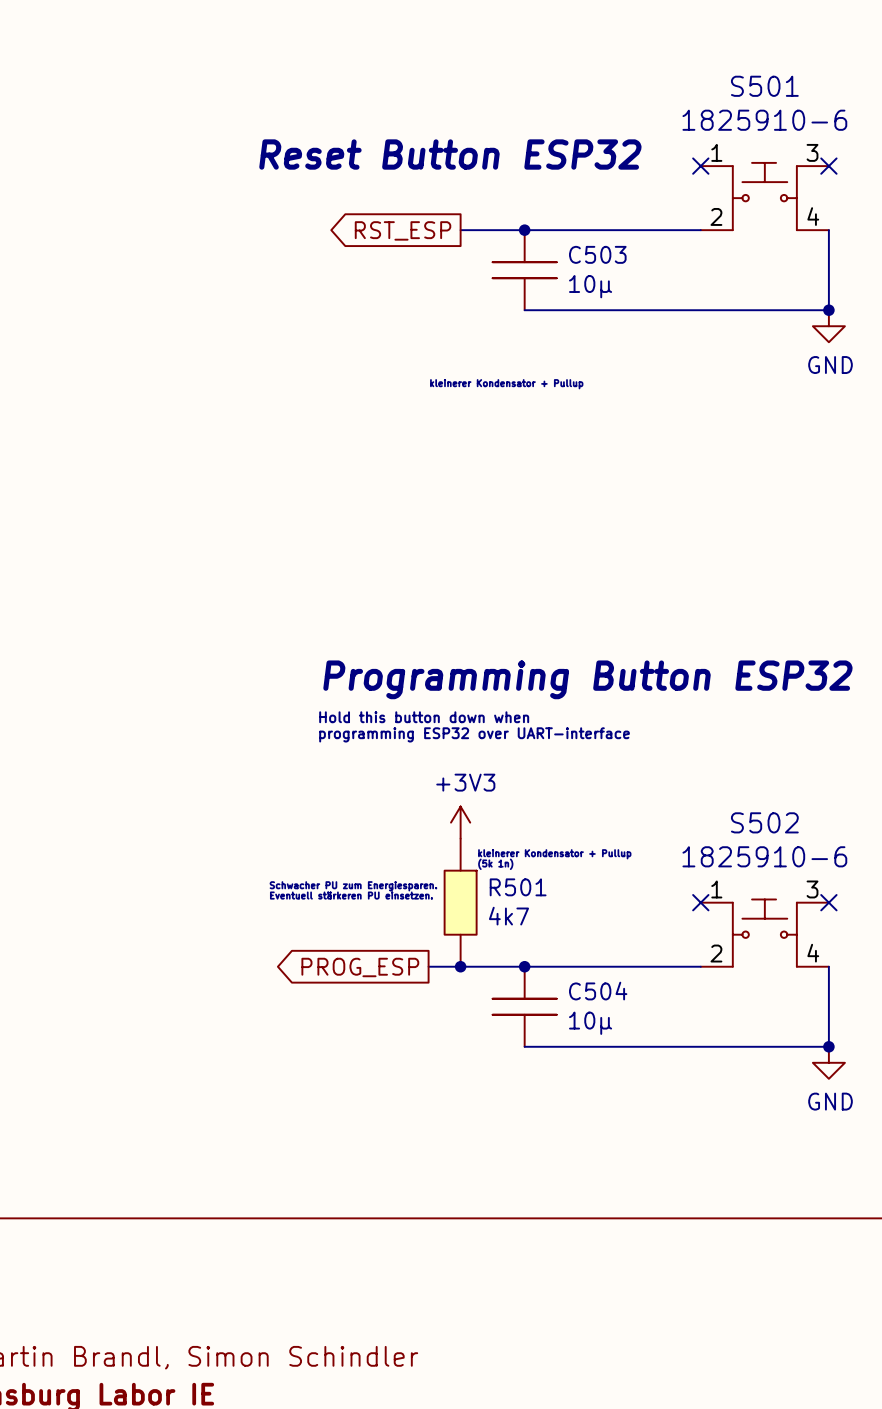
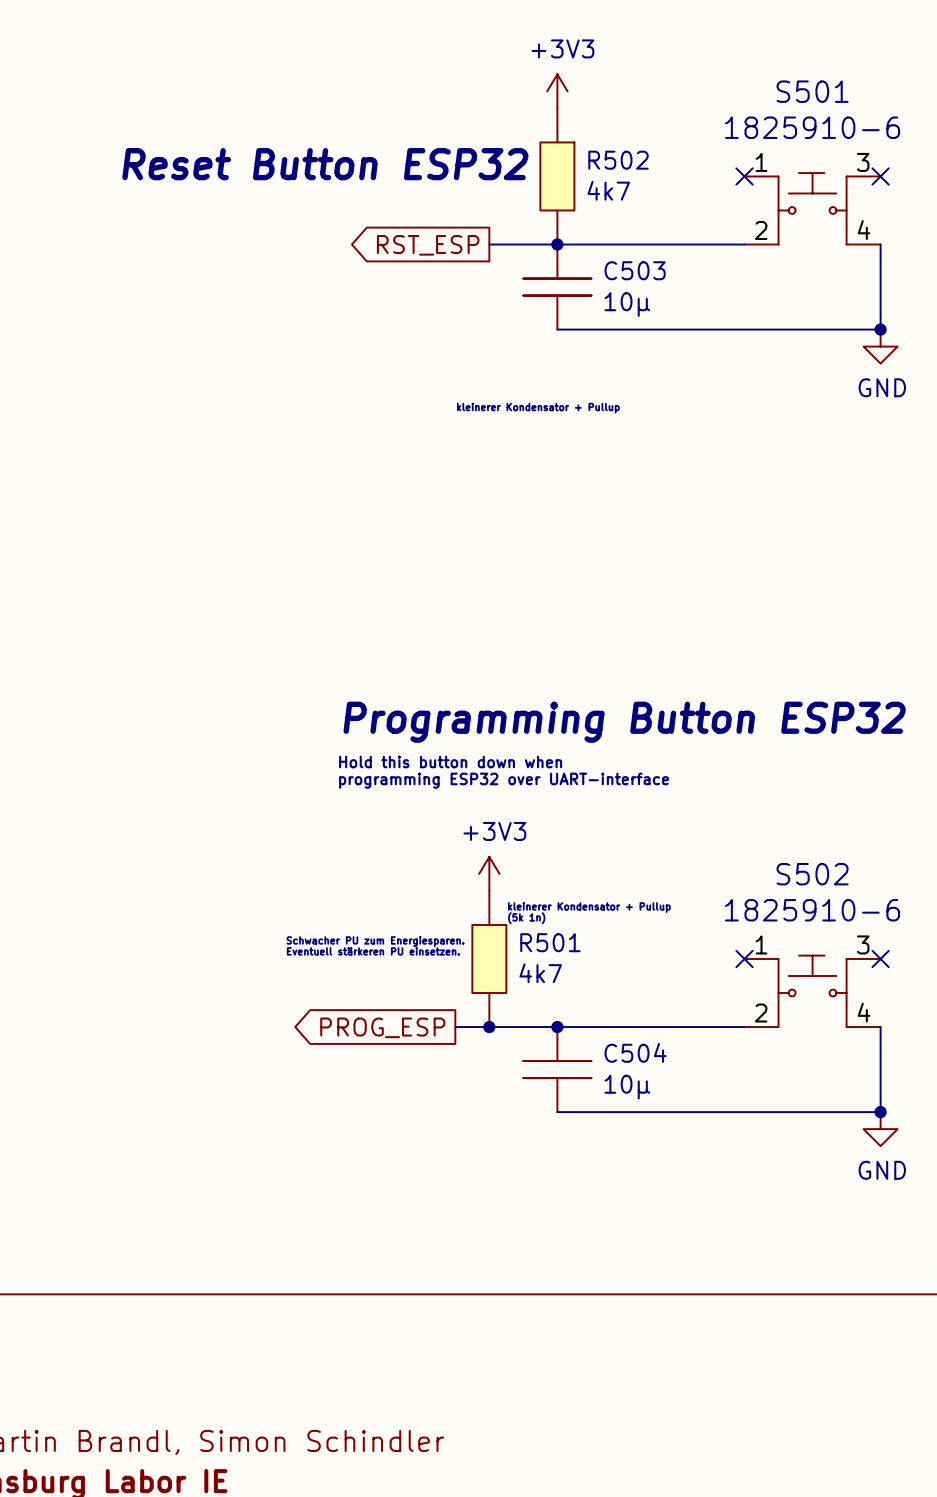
power symbol: none -> +3V3 (557, 91)
text position: Reset Button ESP32 (450, 154) -> Reset Button ESP32 (325, 164)
R502: none -> 4k7 (557, 176)

